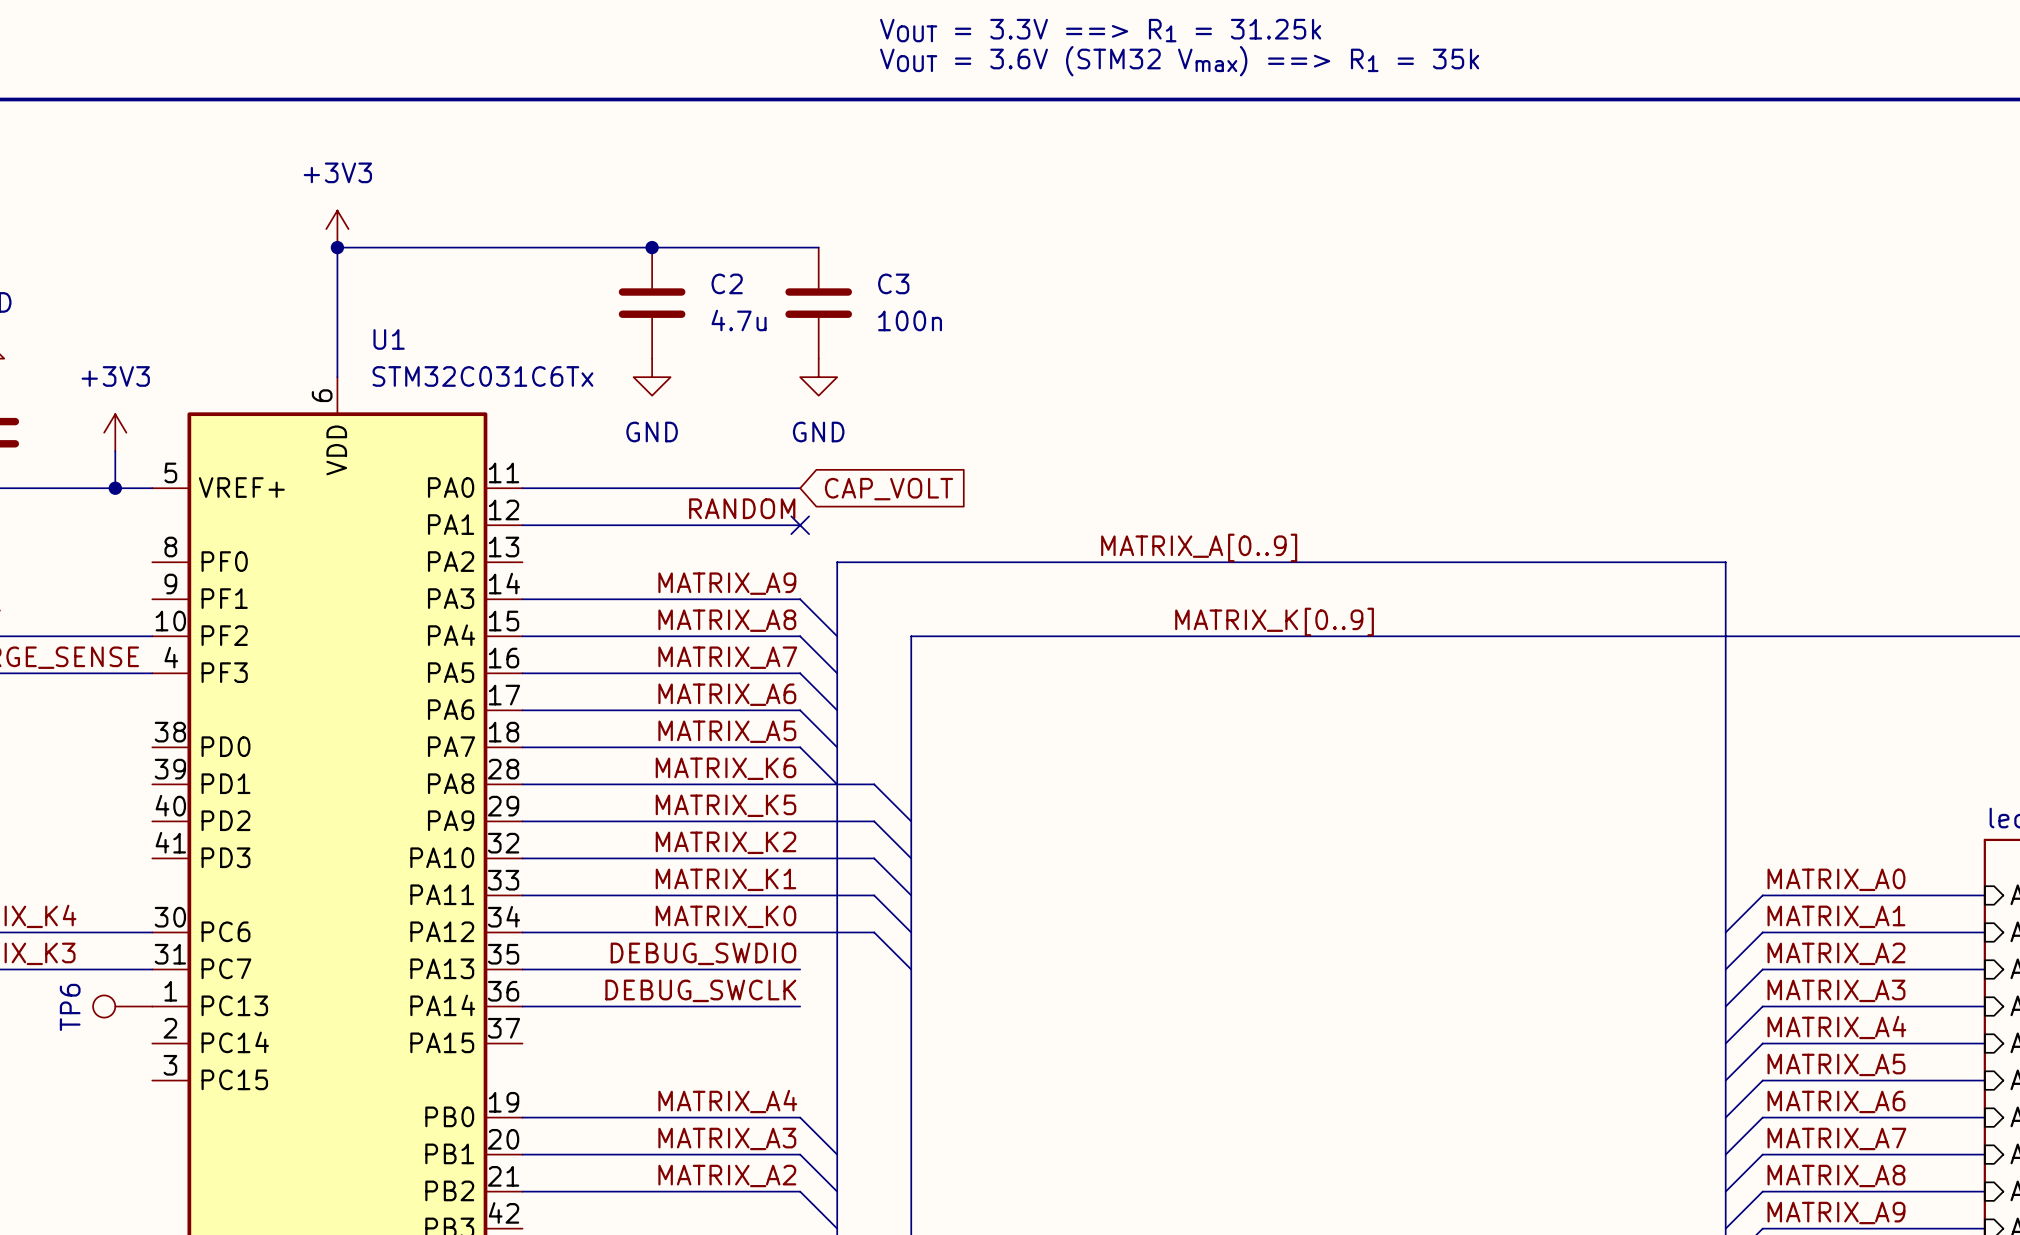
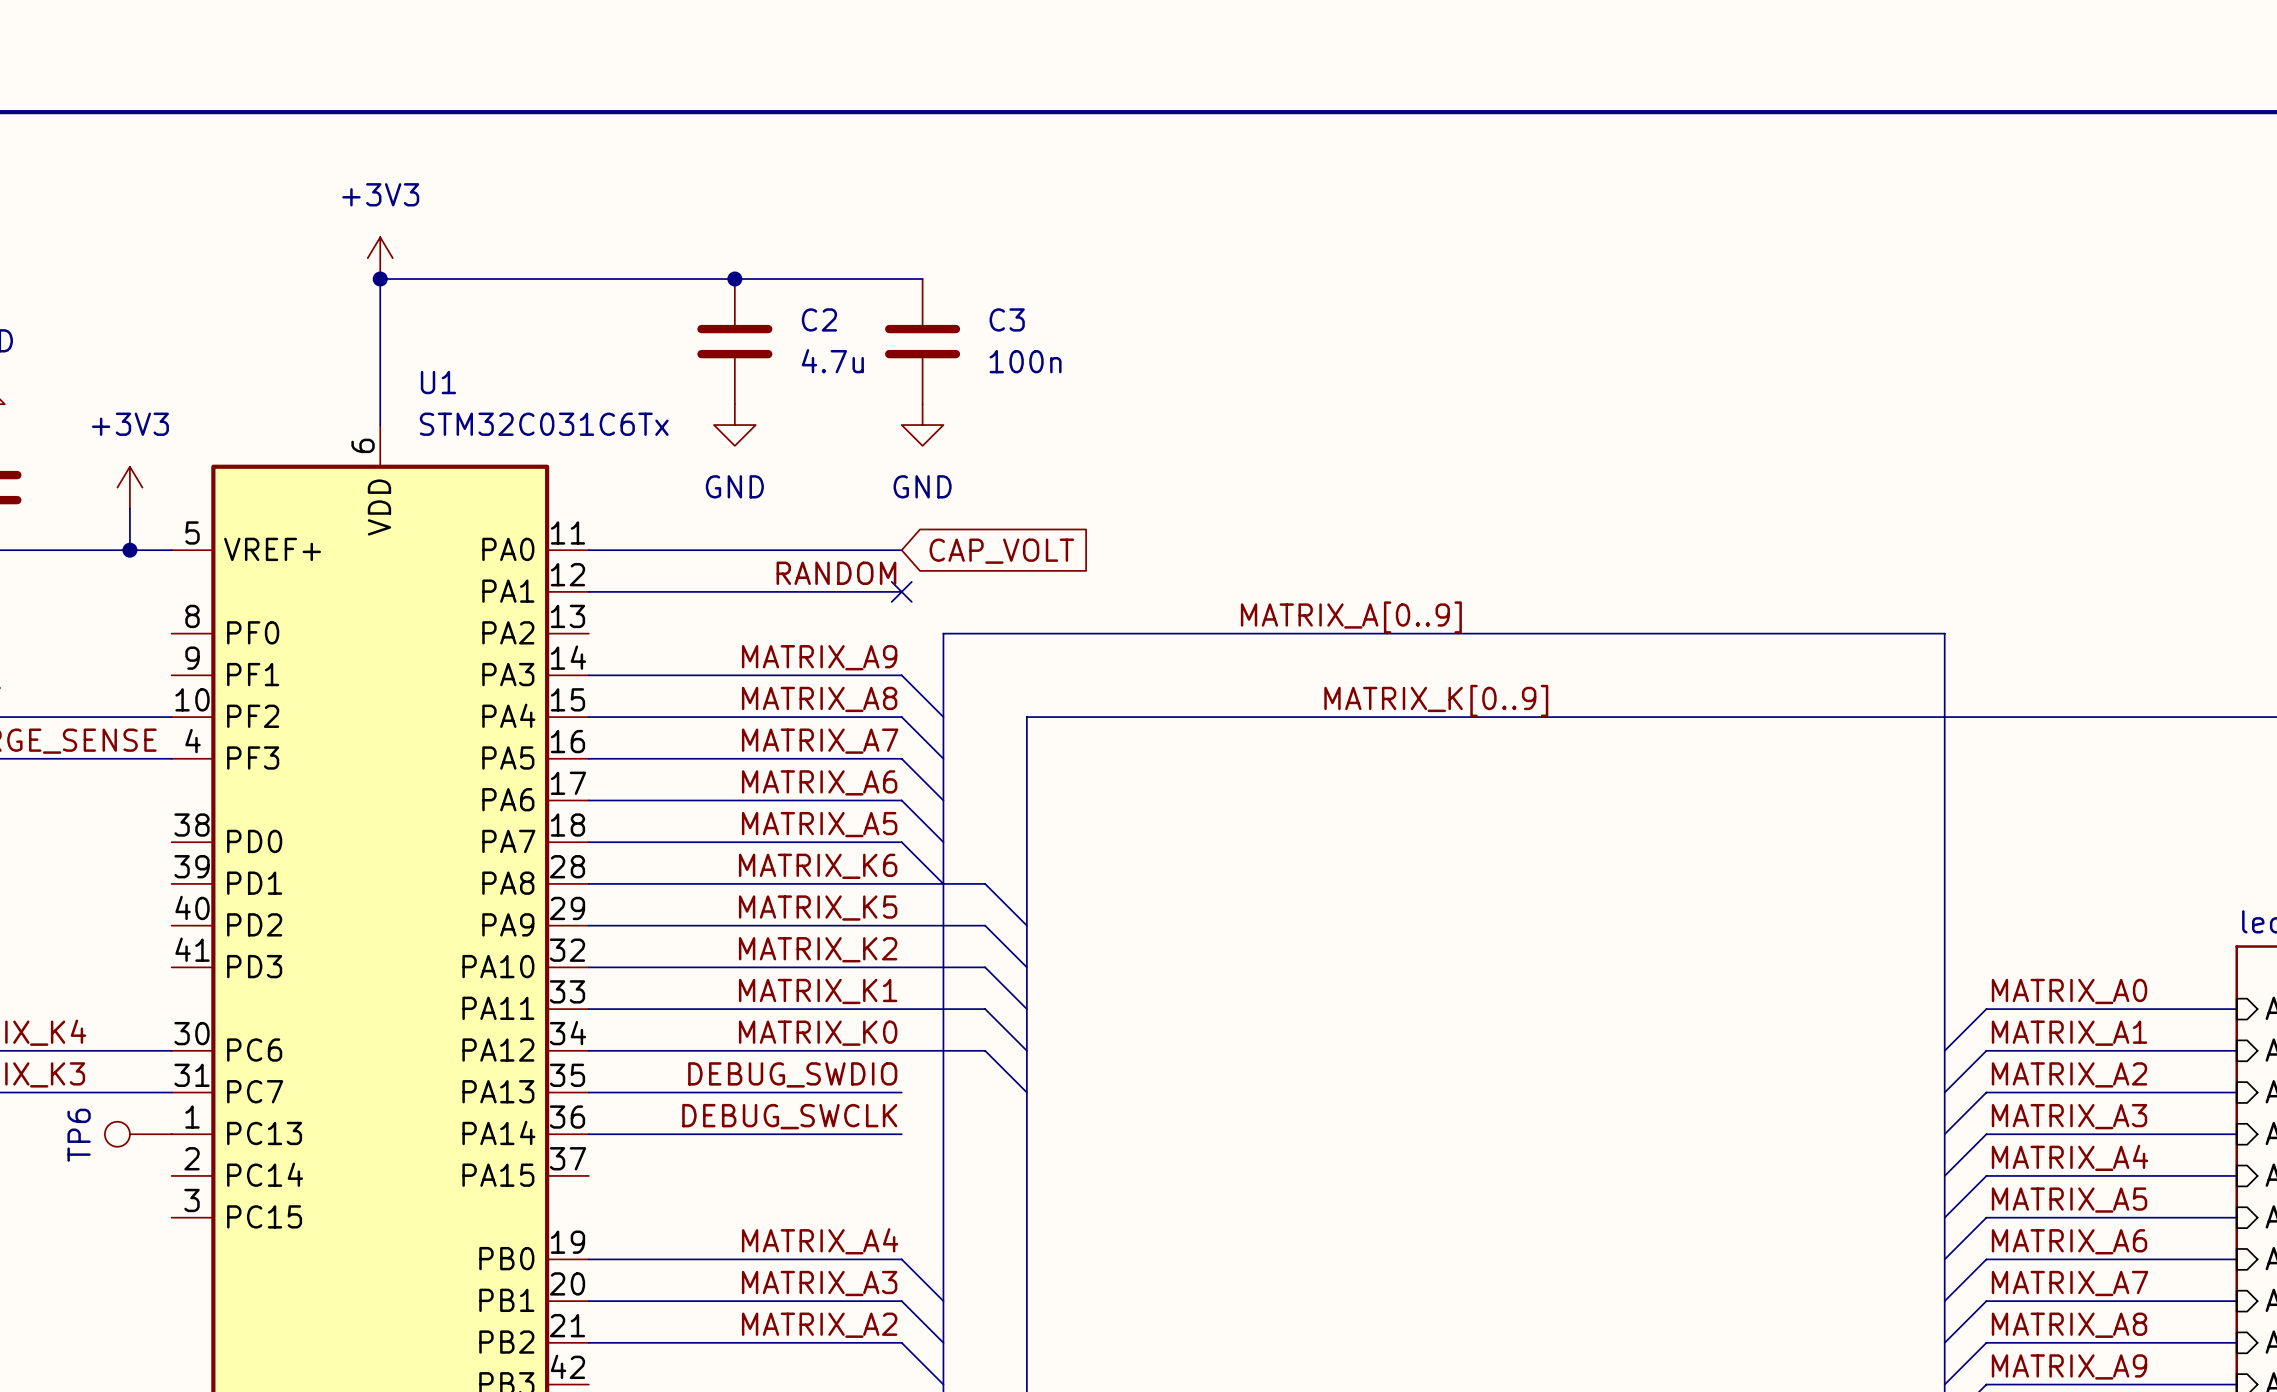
text: VOUT = 3.3V ==> R1 = 31.25k (1100, 30) -> none
text: VOUT = 3.6V (STM32 Vmax) ==> R1 = 35k (1179, 61) -> none

